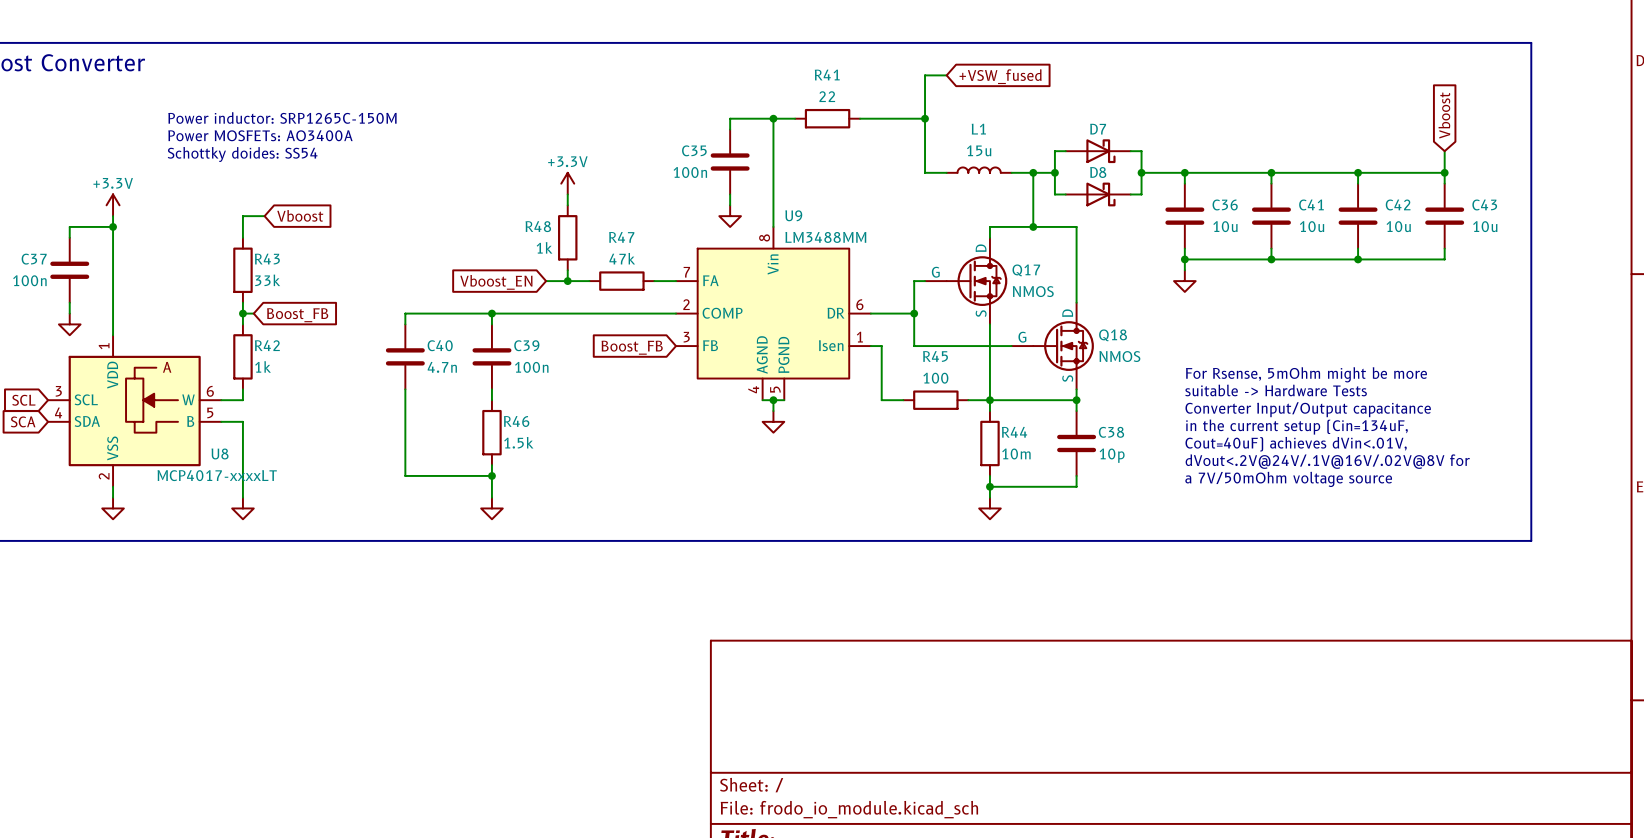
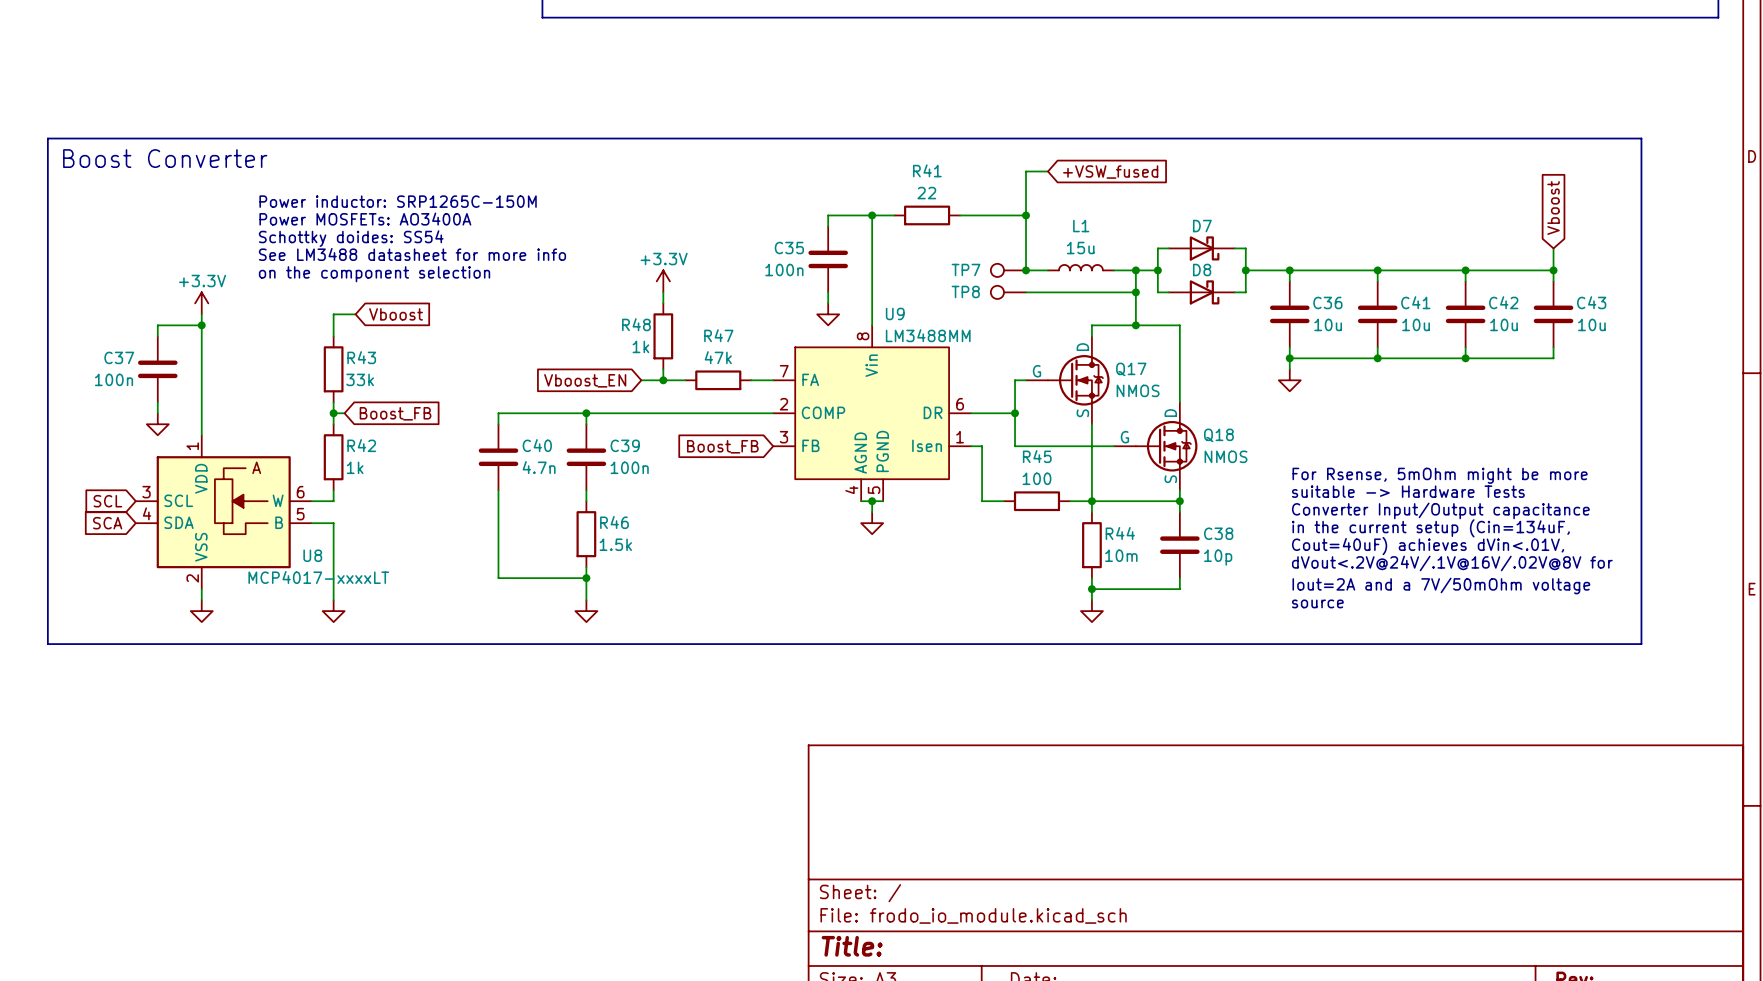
text: none -> Power inductor: SRP1265C-150M (398, 201)
text: Power inductor: SRP1265C-150M (282, 117) -> Power MOSFETs: AO3400A (365, 219)
text: Power MOSFETs: AO3400A (260, 135) -> Schottky doides: SS54 (351, 238)
text: Schottky doides: SS54 (242, 154) -> See LM3488 datasheet for more info (412, 254)
TP7: none -> (1008, 270)
junction: none -> (1026, 270)
text: none -> on the component selection (374, 274)
TP8: none -> (1008, 292)
wire: none -> (1026, 292) (1135, 292)
junction: none -> (1135, 292)
text: a 7V/50mOhm voltage source (1288, 479) -> Iout=2A and a 7V/50mOhm voltage (1441, 585)
text: none -> source (1317, 603)

